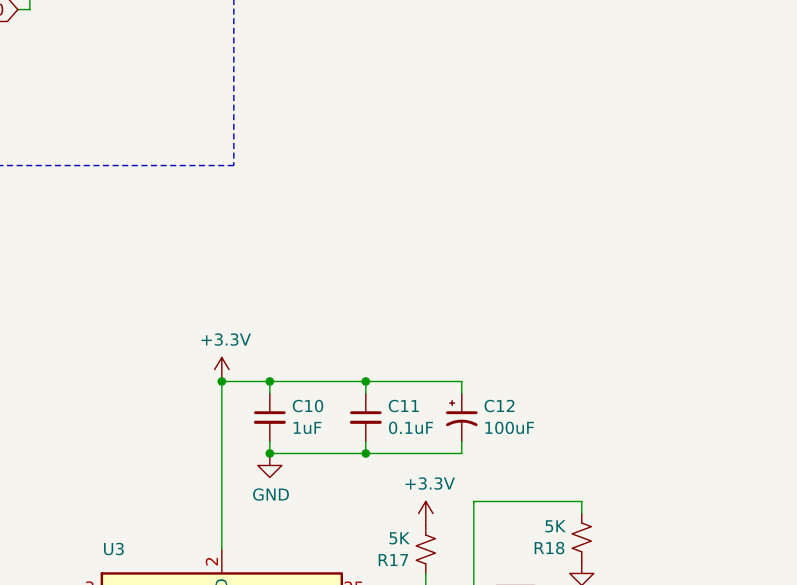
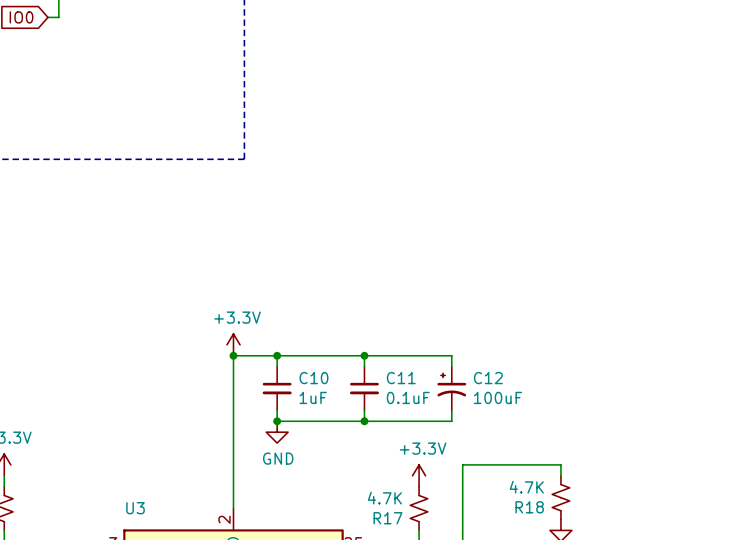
R18 value: 5K (555, 526) -> 4.7K (526, 487)
R17 value: 5K (399, 538) -> 4.7K (384, 498)

